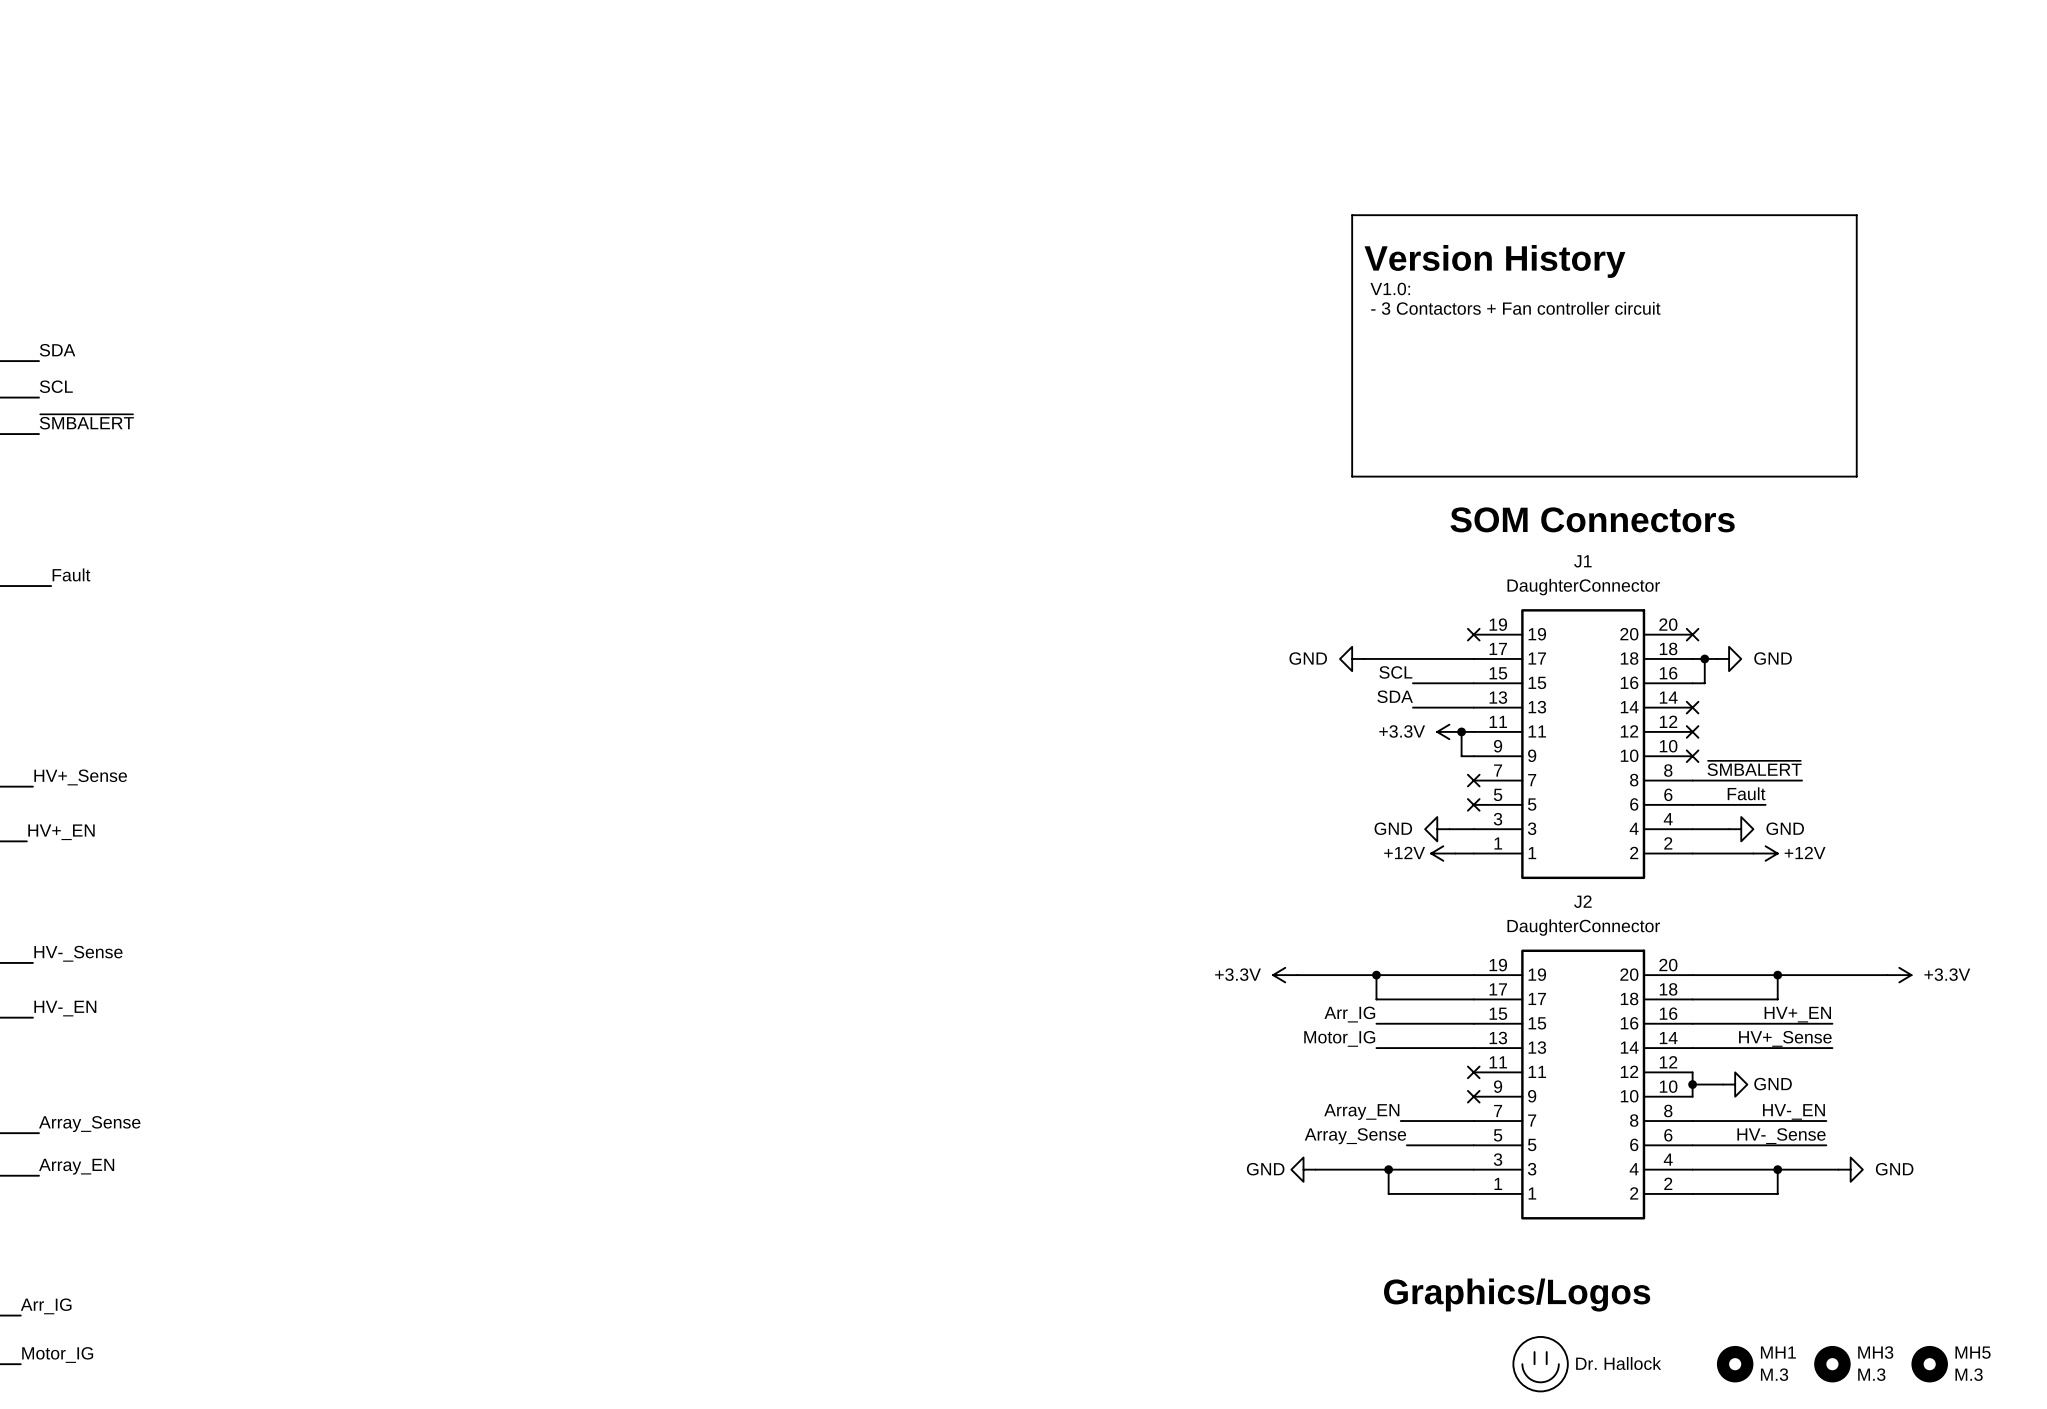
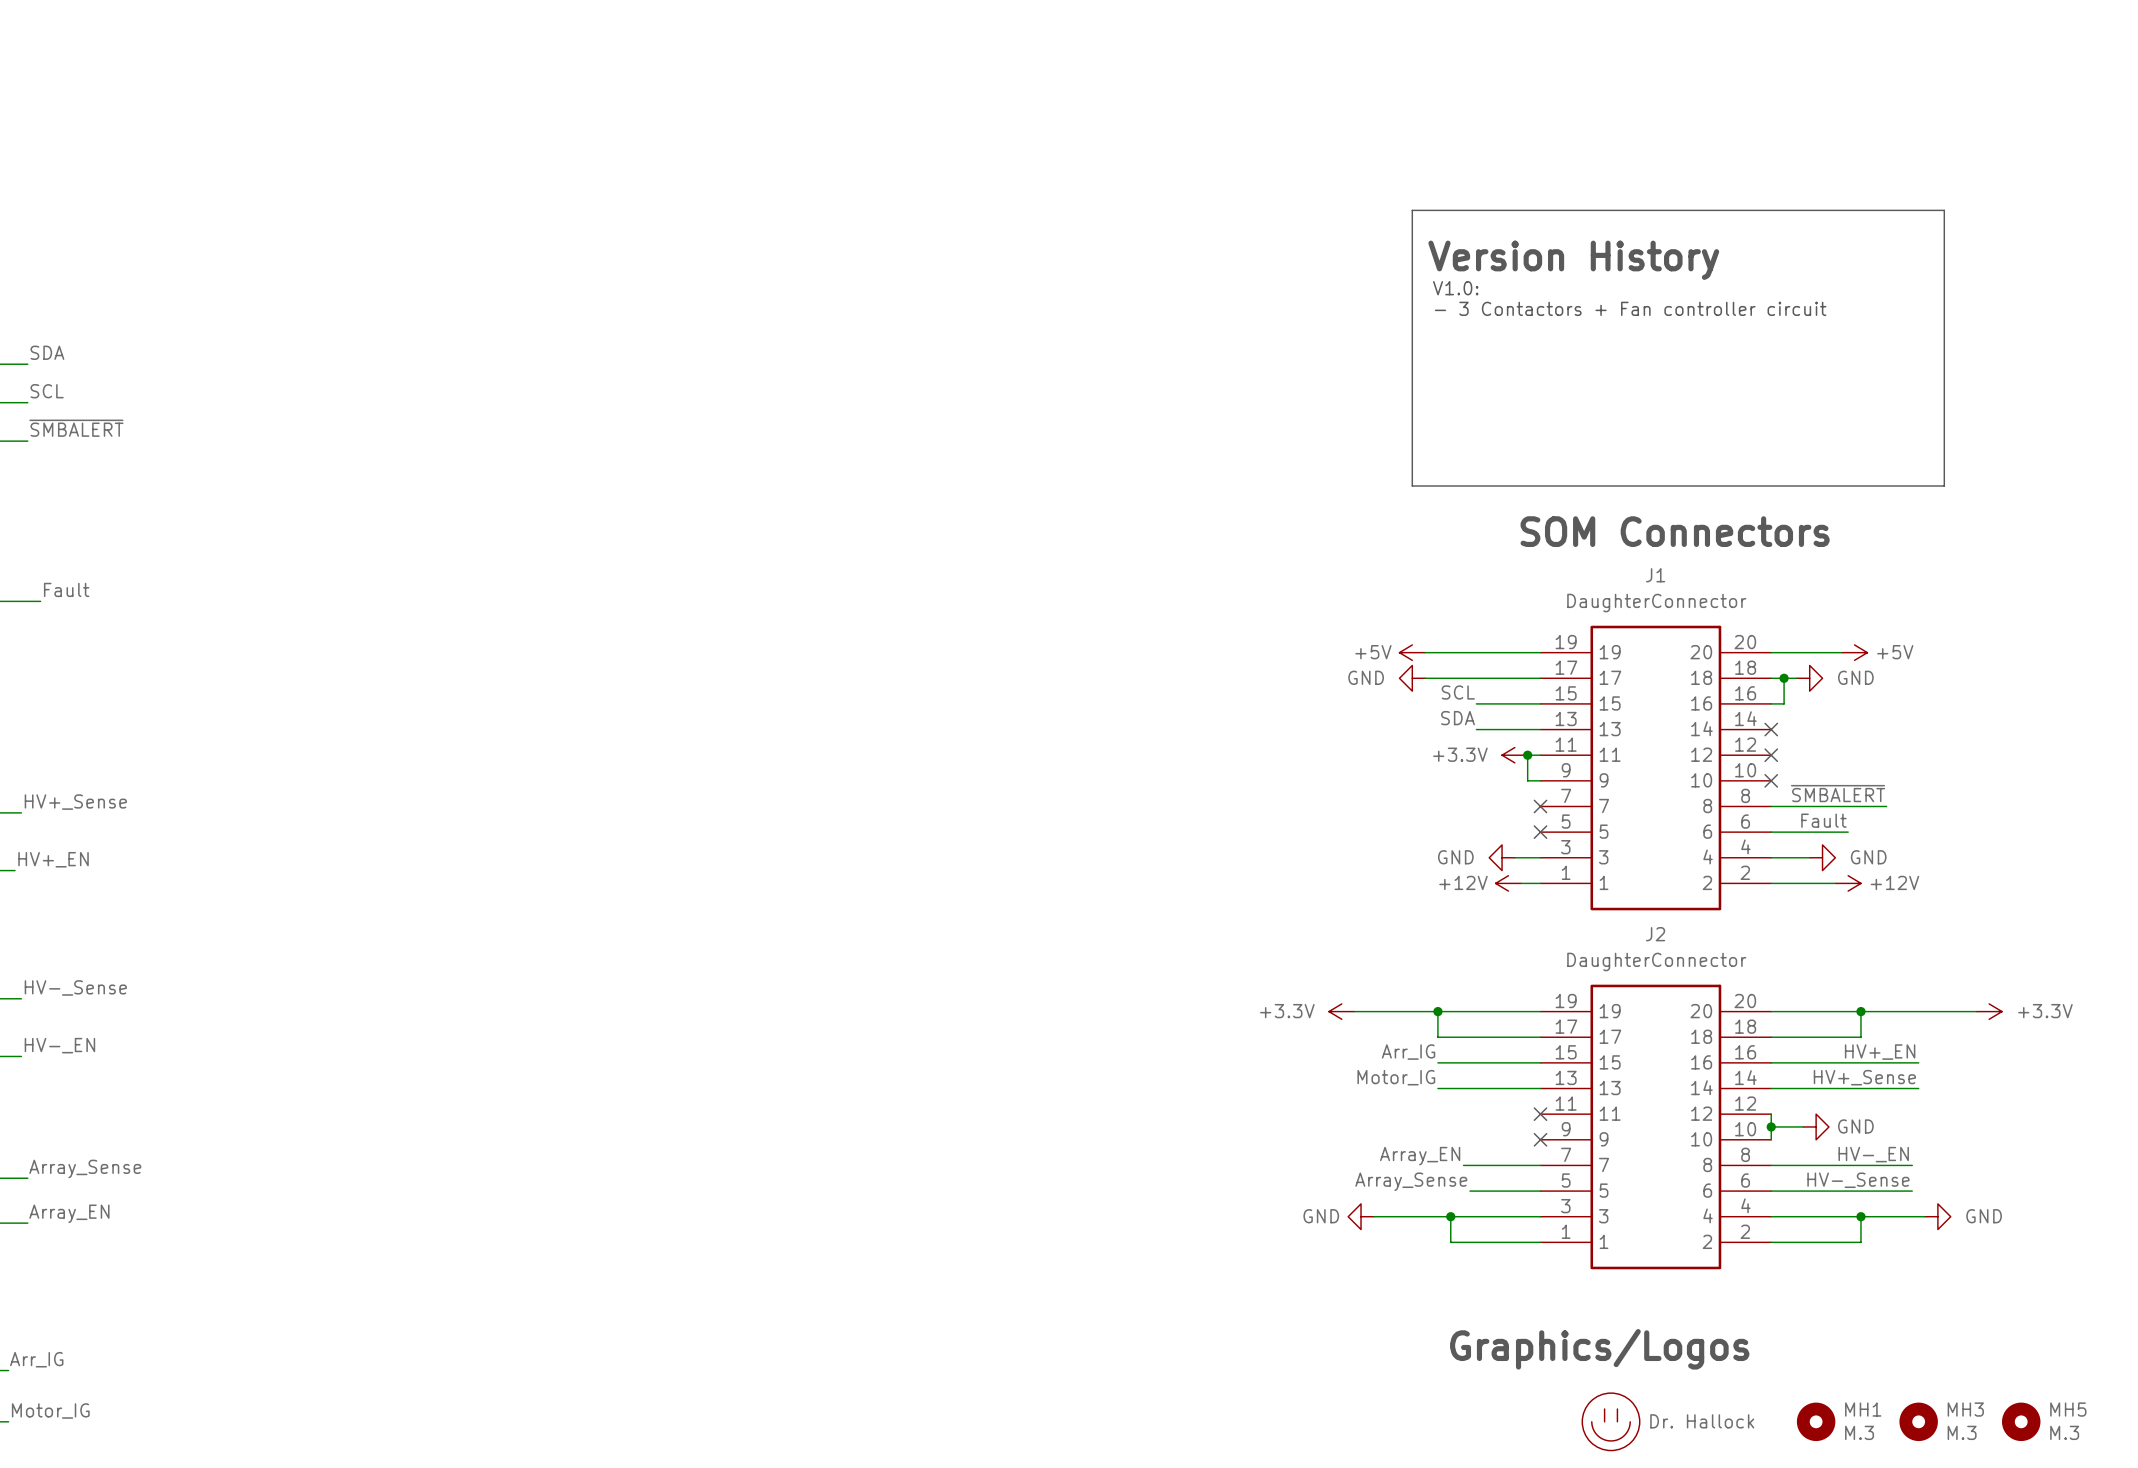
power symbol: none -> +5V (1412, 652)
wire: none -> (1425, 652) (1540, 652)
no-connect mark: (1473, 634) -> none
wire: none -> (1771, 652) (1841, 652)
no-connect mark: (1692, 634) -> none
power symbol: none -> +5V (1854, 652)

